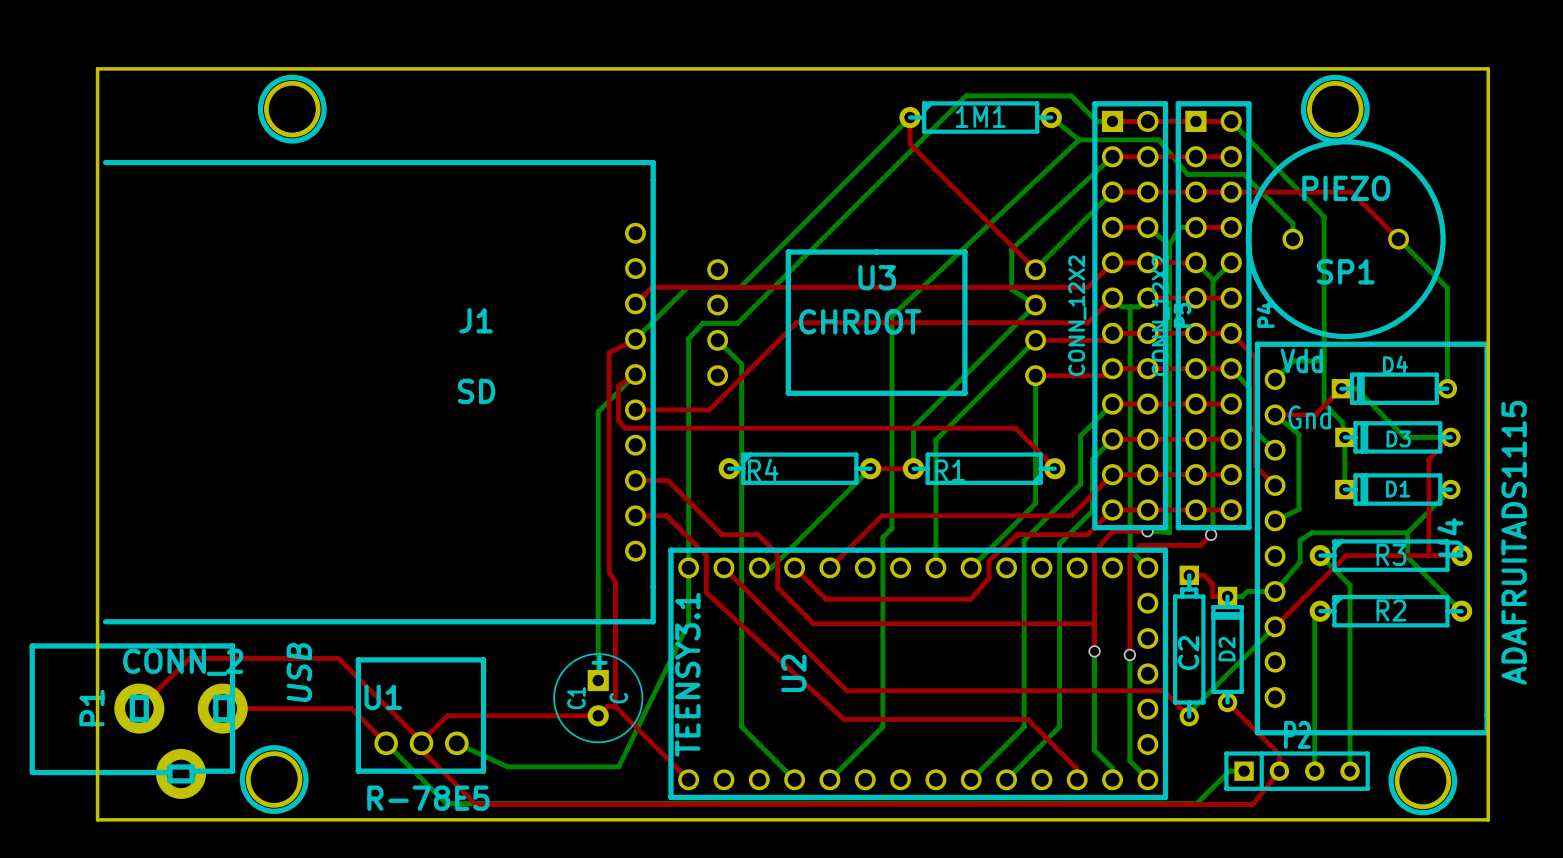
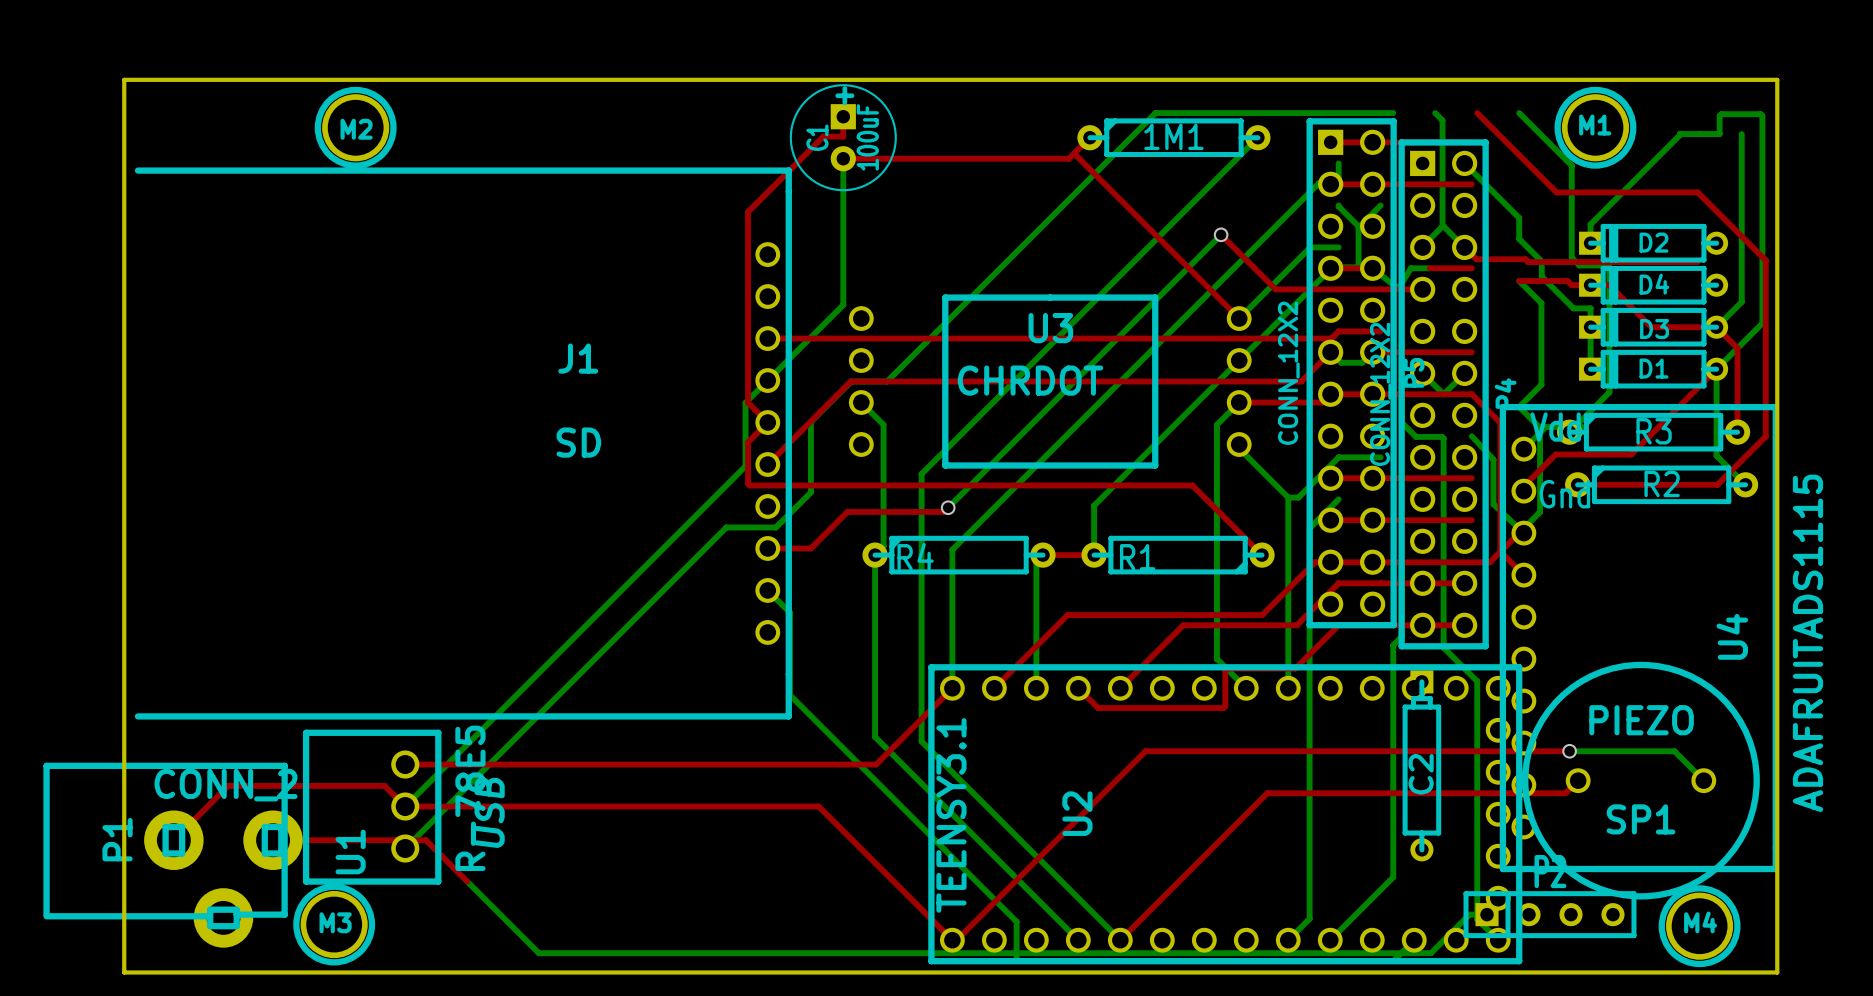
bottom track: none -> (1393, 113) (1155, 113) (887, 381) (851, 381) (810, 421) (810, 492) (775, 527) (726, 527) (405, 848)
bottom track: none -> (1435, 113) (1442, 120) (1442, 226)
top track: none -> (1477, 113) (1556, 192) (1697, 192) (1765, 260) (1765, 436) (1717, 484) (1577, 484)
bottom track: none -> (1519, 113) (1571, 165) (1571, 257) (1579, 265) (1607, 265) (1609, 267) (1609, 392) (1569, 432)
M1 name: none -> M1 (1595, 125)
M2 name: none -> M2 (356, 129)
bottom track: none -> (1741, 134) (1741, 302) (1716, 327)
top track: (910, 117) (910, 144) -> (1074, 153) (1089, 169)
top track: none -> (1089, 137) (1068, 158) (843, 158)
bottom track: (910, 117) (740, 287) (687, 287) (635, 339) -> none
bottom track: (1051, 117) (1079, 139) -> (1257, 137) (921, 473) (921, 741) (1120, 940)
bottom track: (1112, 121) (1096, 121) (1071, 95) (966, 95) (737, 323) (702, 323) (688, 338) (688, 622) (618, 766) (507, 766) (456, 743) -> none
bottom track: (1231, 121) (1324, 216) (1324, 404) (1342, 422) (1344, 437) (1344, 489) -> none
bottom track: none -> (843, 158) (843, 304) (745, 402) (745, 466) (405, 806)
bottom track: (1079, 139) (1158, 139) (1187, 174) (1243, 174) (1292, 223) (1292, 239) -> none
bottom track: (1079, 139) (892, 315) (892, 528) (882, 537) (882, 726) (829, 779) -> none
bottom track: none -> (1338, 163) (1338, 183) (1318, 183) (952, 549) (952, 688)
bottom track: none -> (1464, 163) (1519, 218) (1519, 239) (1541, 261) (1541, 276) (1573, 308) (1590, 308) (1590, 369)
bottom track: (1112, 156) (1011, 249) (1011, 289) (1035, 305) -> (1358, 226) (1358, 266) (1332, 267) (1239, 360)
bottom track: none -> (1338, 205) (1358, 226)
bottom track: none -> (1380, 205) (1358, 226)
top track: (1112, 192) (1351, 192) (1398, 239) -> none
bottom track: (1112, 192) (1035, 269) -> (1338, 247) (1310, 247) (1239, 318)
bottom track: none -> (1442, 226) (1464, 247)
bottom track: none -> (1442, 226) (1422, 247)
top track: none -> (1221, 234) (1275, 289) (1422, 289)
bottom track: none -> (1221, 234) (948, 507)
via: none -> (1221, 234)
bottom track: none -> (1590, 243) (1590, 224) (1679, 134) (1719, 134) (1719, 115) (1721, 114) (1760, 114) (1762, 115) (1762, 323) (1716, 369) (1716, 455) (1745, 484)
top track: none -> (1464, 247) (1476, 259) (1525, 259) (1528, 262) (1697, 262)
top track: none -> (1519, 281) (1567, 281) (1571, 285) (1609, 285) (1651, 327) (1716, 327) (1737, 348) (1737, 432)
bottom track: none -> (1519, 281) (1541, 303) (1541, 384) (1519, 406) (1540, 427) (1540, 512) (1519, 532)
SP1 position: (1345, 239) -> (1640, 780)
bottom track: (1398, 239) (1447, 288) (1447, 388) -> none
bottom track: (1169, 244) (1169, 532) (1147, 531) -> none
top track: (1195, 262) (1112, 262) (1087, 287) (652, 287) (635, 303) -> none
bottom track: (1195, 262) (1213, 280) -> none
bottom track: (1231, 262) (1213, 280) -> none
top track: none -> (1380, 331) (1338, 331) (1331, 338) (767, 338)
bottom track: (1213, 280) (1213, 529) (1211, 534) -> none
bottom track: none -> (1401, 341) (1401, 422) (1416, 436) (1441, 436) (1443, 438) (1443, 647) (1477, 681) (1477, 919) (1498, 940)
bottom track: (1130, 306) (1130, 550) (1147, 567) -> none
top track: none -> (1716, 369) (1631, 454) (1555, 454) (1519, 490)
bottom track: none -> (1422, 373) (1443, 394) (1464, 373)
P4 position: (1213, 315) -> (1443, 394)
top track: (796, 322) (709, 409) (635, 409) -> (955, 381) (850, 381) (767, 464)
top track: (635, 339) (609, 353) (609, 571) (615, 582) (615, 706) -> none
bottom track: (736, 359) (741, 364) (741, 726) (794, 779) -> (883, 424) (883, 546) (875, 555) (875, 736) (1078, 940)
bottom track: (1016, 359) (935, 440) (935, 567) -> (1216, 424) (1216, 658) (1246, 688)
D4 name position: D4 (1395, 364) -> D4 (1654, 284)
top track: (1231, 368) (1112, 368) (1105, 375) (1035, 375) -> none
top track: (635, 374) (618, 386) (618, 420) (624, 428) (1015, 428) (1054, 468) -> (843, 116) (843, 136) (823, 136) (748, 211) (748, 402) (767, 422) (748, 442) (748, 483) (749, 485) (1192, 485) (1262, 555)
bottom track: (635, 374) (598, 411) (598, 680) -> none
bottom track: (1035, 379) (1035, 503) (971, 567) -> (1239, 448) (1288, 497)
bottom track: none -> (1380, 457) (1338, 457) (1298, 497) (1288, 497)
top track: (1341, 388) (1315, 414) (1275, 414) -> none
bottom track: (1341, 388) (1356, 388) (1404, 437) (1450, 437) -> none
D4 position: (1394, 388) -> (1653, 285)
J1 position: (379, 392) -> (463, 443)
bottom track: (1112, 404) (1080, 435) (1080, 484) (1024, 540) (1024, 726) (971, 779) -> none
bottom track: (1275, 414) (1298, 434) (1298, 509) (1275, 520) -> none
bottom track: none -> (1288, 497) (1288, 688)
bottom track: none -> (1338, 499) (1309, 528) (1309, 918) (1288, 940)
top track: none -> (948, 507) (944, 511) (847, 511) (810, 548) (767, 548)
via: none -> (948, 507)
D3 position: (1397, 437) -> (1653, 327)
top track: (1450, 437) (1428, 459) (1428, 555) -> none
bottom track: (1112, 439) (1092, 459) (1092, 510) (1059, 543) (1059, 726) (1006, 779) -> none
top track: none -> (1519, 532) (1489, 562) (1314, 562) (1262, 615) (1067, 615) (994, 688)
bottom track: (864, 474) (771, 567) (759, 567) -> (1036, 561) (1036, 688)
bottom track: none -> (1401, 562) (1401, 636) (1393, 645) (1393, 877) (1330, 940)
top track: (1231, 474) (1112, 474) (1071, 515) (882, 515) (829, 567) -> none
top track: (635, 480) (667, 480) (722, 534) (758, 534) (777, 554) (777, 587) (813, 623) (1094, 623) -> none
D1 position: (1397, 489) -> (1653, 369)
bottom track: (1450, 489) (1407, 532) -> none
top track: none -> (1464, 583) (1338, 583) (1296, 625) (1183, 625) (1120, 688)
bottom track: none -> (767, 590) (790, 612) (790, 695) (1016, 921) (1016, 959) (1018, 960) (1393, 960) (1414, 940)
top track: (1231, 509) (1112, 509) (1087, 534) (1017, 534) (989, 560) (989, 578) (970, 599) (826, 599) (794, 567) -> none
top track: (635, 515) (666, 515) (706, 555) (706, 592) (844, 719) (1027, 719) (1076, 768) (1077, 779) -> none
top track: none -> (1464, 625) (1338, 625) (1295, 668) (1226, 668) (1225, 670) (1225, 706) (1223, 708) (1098, 708) (1078, 688)
top track: (1147, 531) (1112, 531) (1094, 552) (1094, 651) -> none
via: (1147, 531) -> none
bottom track: (1407, 532) (1407, 557) (1461, 611) -> none
bottom track: (1407, 532) (1311, 532) (1300, 540) (1300, 562) (1275, 591) (1247, 591) (1242, 596) (1227, 596) -> none
top track: (1211, 534) (1200, 545) (1140, 545) (1129, 556) (1129, 654) -> none
via: (1211, 534) -> none
bottom track: (1320, 555) (1350, 585) (1350, 771) -> none
R3 position: (1390, 555) -> (1653, 432)
top track: (1461, 555) (1346, 555) (1275, 626) -> none
top track: (723, 567) (846, 690) (1163, 690) (1189, 716) -> none
top track: (1189, 575) (1204, 575) (1212, 584) (1212, 596) (1227, 596) -> none
top track: none -> (952, 688) (876, 764) (405, 764)
bottom track: (1320, 611) (1314, 616) (1314, 771) -> none
R2 position: (1390, 611) -> (1661, 484)
bottom track: (1275, 626) (1189, 712) (1189, 716) -> none
bottom track: none -> (1569, 751) (1674, 751) (1703, 780)
via: none -> (1569, 751)
D2 rotation: 0° (1227, 649) -> 90° counterclockwise (1653, 243)
D2 position: (1227, 649) -> (1653, 243)
bottom track: (1094, 651) (1094, 750) (1112, 768) (1112, 779) -> none
via: (1094, 651) -> none
bottom track: (1129, 654) (1129, 760) (1147, 779) -> none
via: (1129, 654) -> none
top track: none -> (1578, 780) (1565, 793) (1267, 793) (1120, 940)
top track: (185, 662) (189, 658) (338, 658) (421, 741) (421, 750) (475, 804) (1253, 804) (1279, 771) (1279, 754) (1227, 702) -> (228, 785) (384, 785) (405, 806) (818, 806) (952, 940) (956, 940) (1145, 751) (1569, 751)
U2 position: (918, 673) -> (1225, 814)
C1 position: (598, 698) -> (843, 137)
C1 value: C (618, 698) -> 100uF (867, 137)
top track: (615, 706) (607, 706) (598, 715) (447, 715) (421, 741) -> none
top track: (615, 706) (688, 779) -> none
U1 rotation: 0° (420, 715) -> 90° counterclockwise (372, 807)
U1 position: (420, 715) -> (372, 807)
M4 name: none -> M4 (1700, 922)
M3 name: none -> M3 (335, 922)

